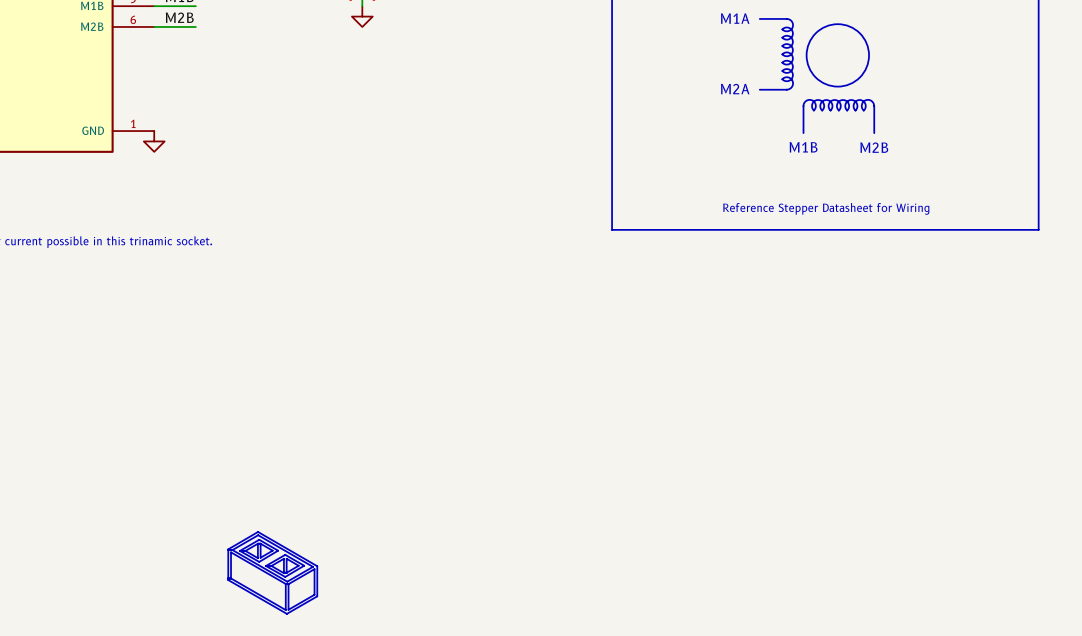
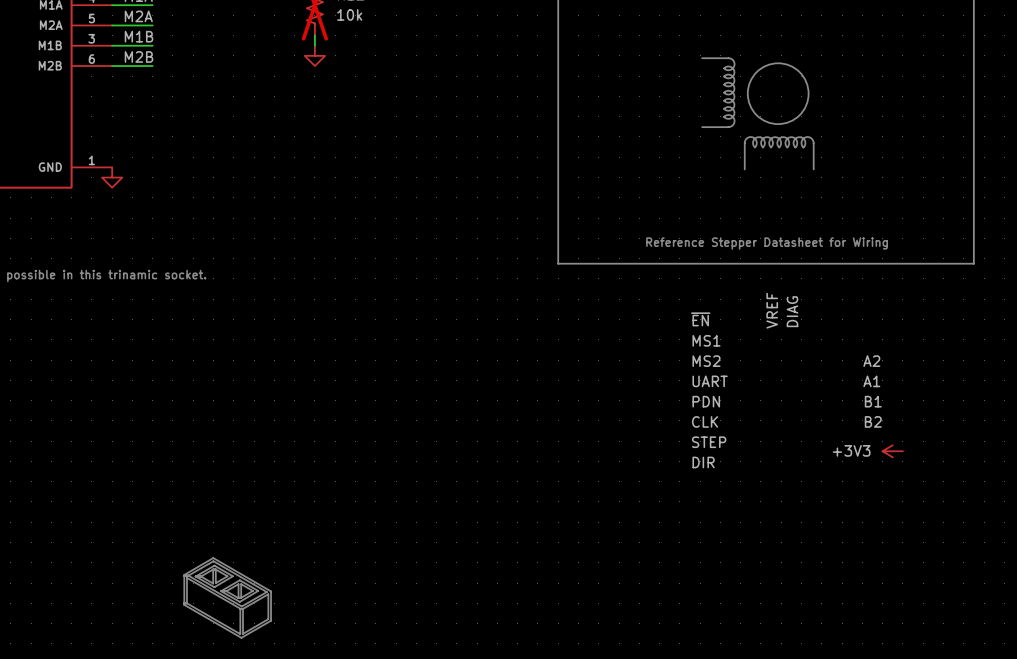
text: M1A (735, 18) -> none
text: M2A (735, 89) -> none
text: M1B (803, 147) -> none
text: M2B (874, 147) -> none
label: none -> VREF (772, 310)
label: none -> DIAG (792, 311)
label: none -> ~{EN} (700, 319)
label: none -> MS1 (706, 340)
label: none -> MS2 (706, 361)
label: none -> A2 (871, 361)
label: none -> UART (710, 381)
label: none -> A1 (871, 381)
label: none -> PDN (706, 401)
label: none -> B1 (873, 401)
label: none -> CLK (705, 421)
label: none -> B2 (873, 421)
label: none -> STEP (709, 442)
power symbol: none -> +3V3 (892, 451)
label: none -> DIR (703, 462)

